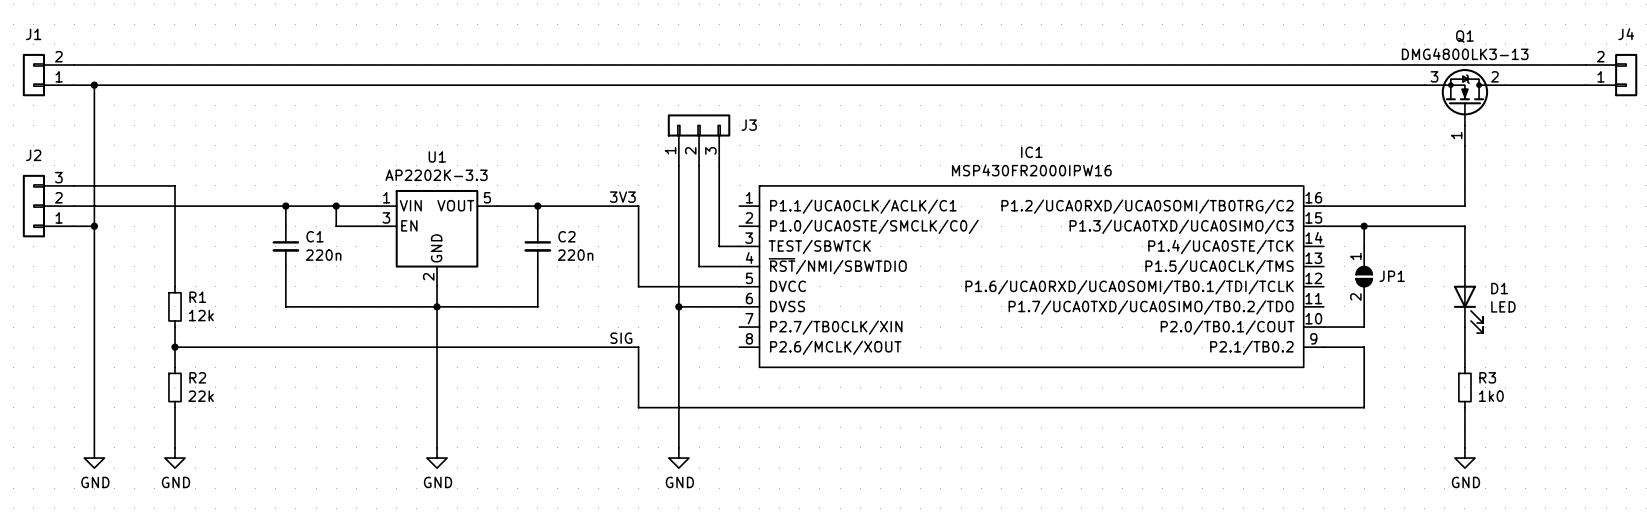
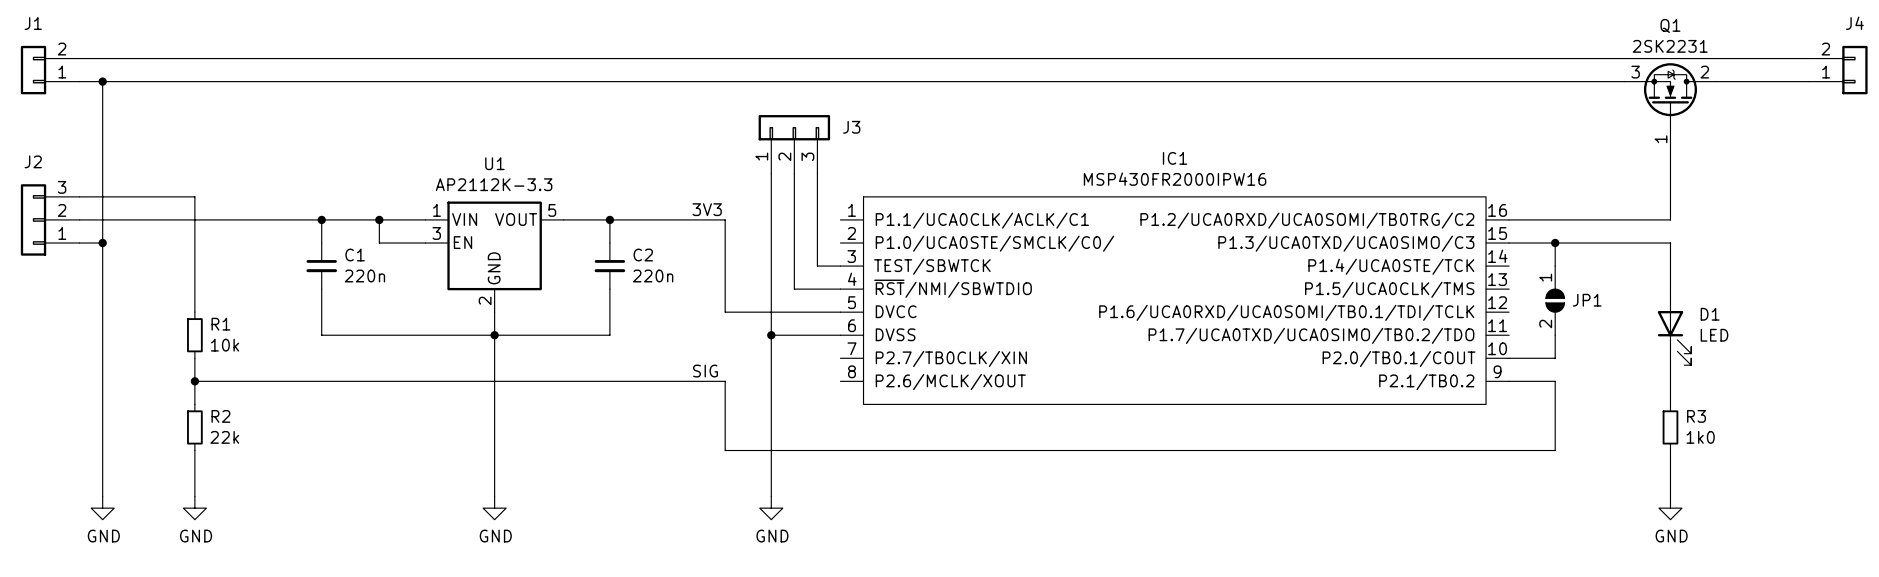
Q1 value: DMG4800LK3-13 (1465, 54) -> 2SK2231 (1670, 46)
U1 value: AP2202K-3.3 (436, 175) -> AP2112K-3.3 (494, 184)
R1 value: 12k (201, 315) -> 10k (225, 345)

